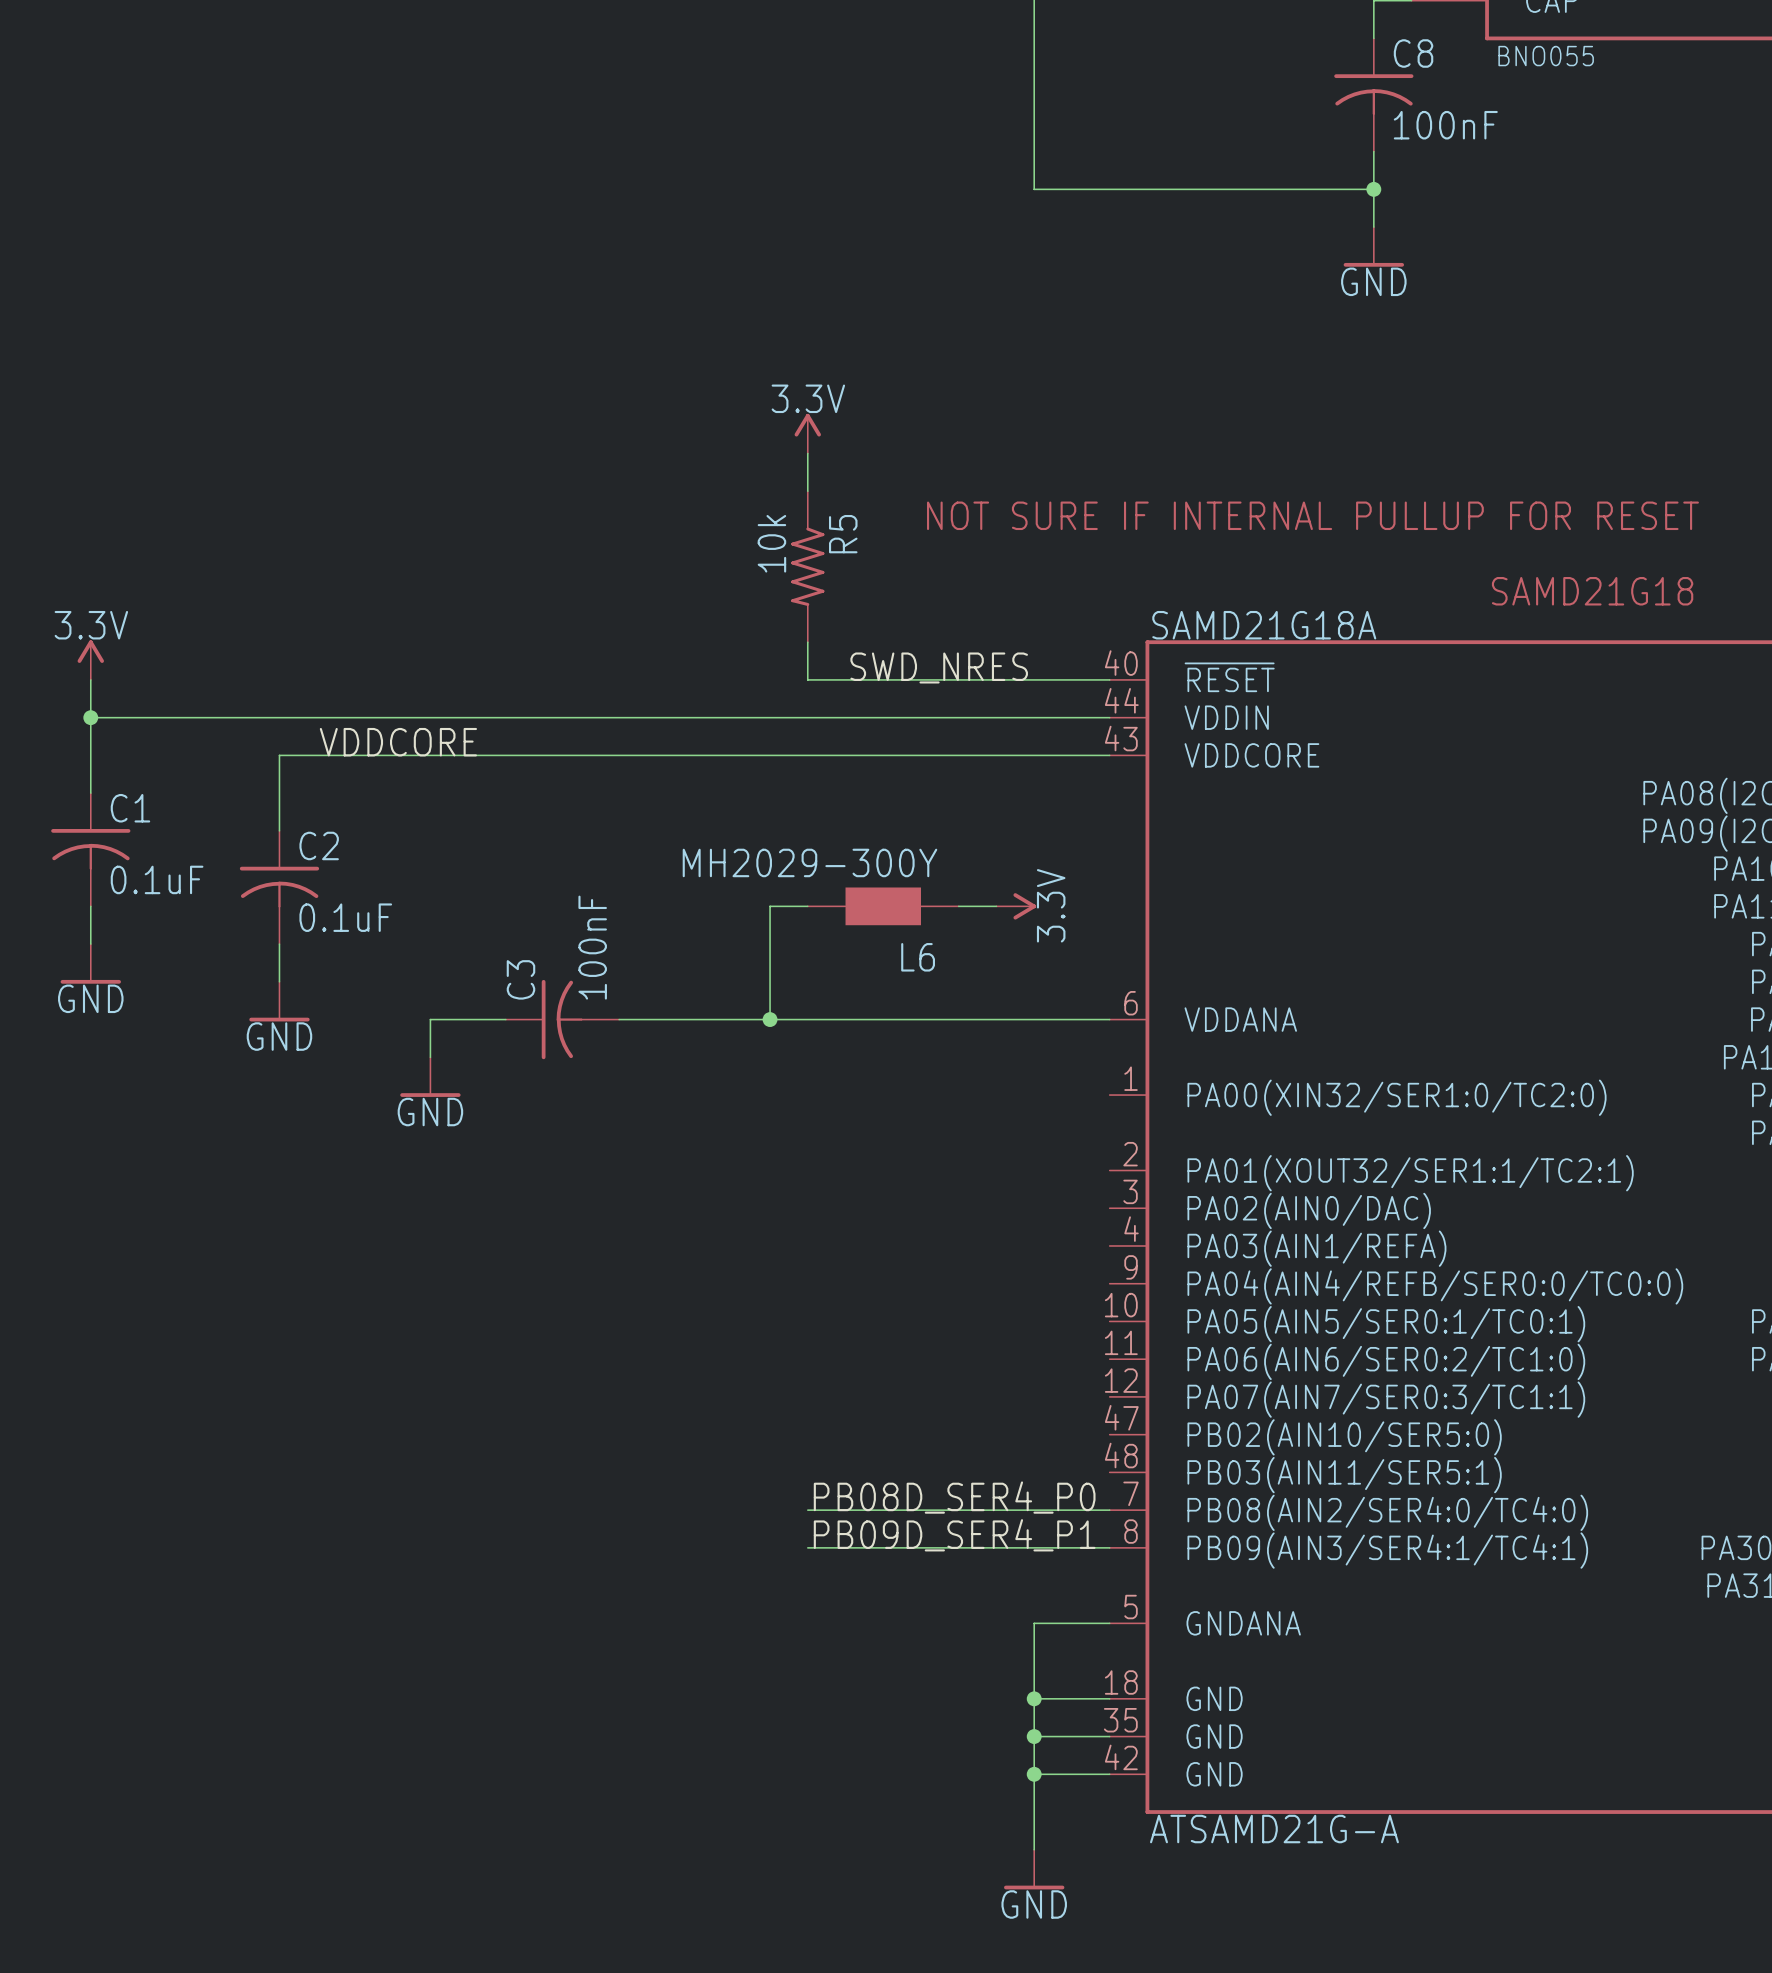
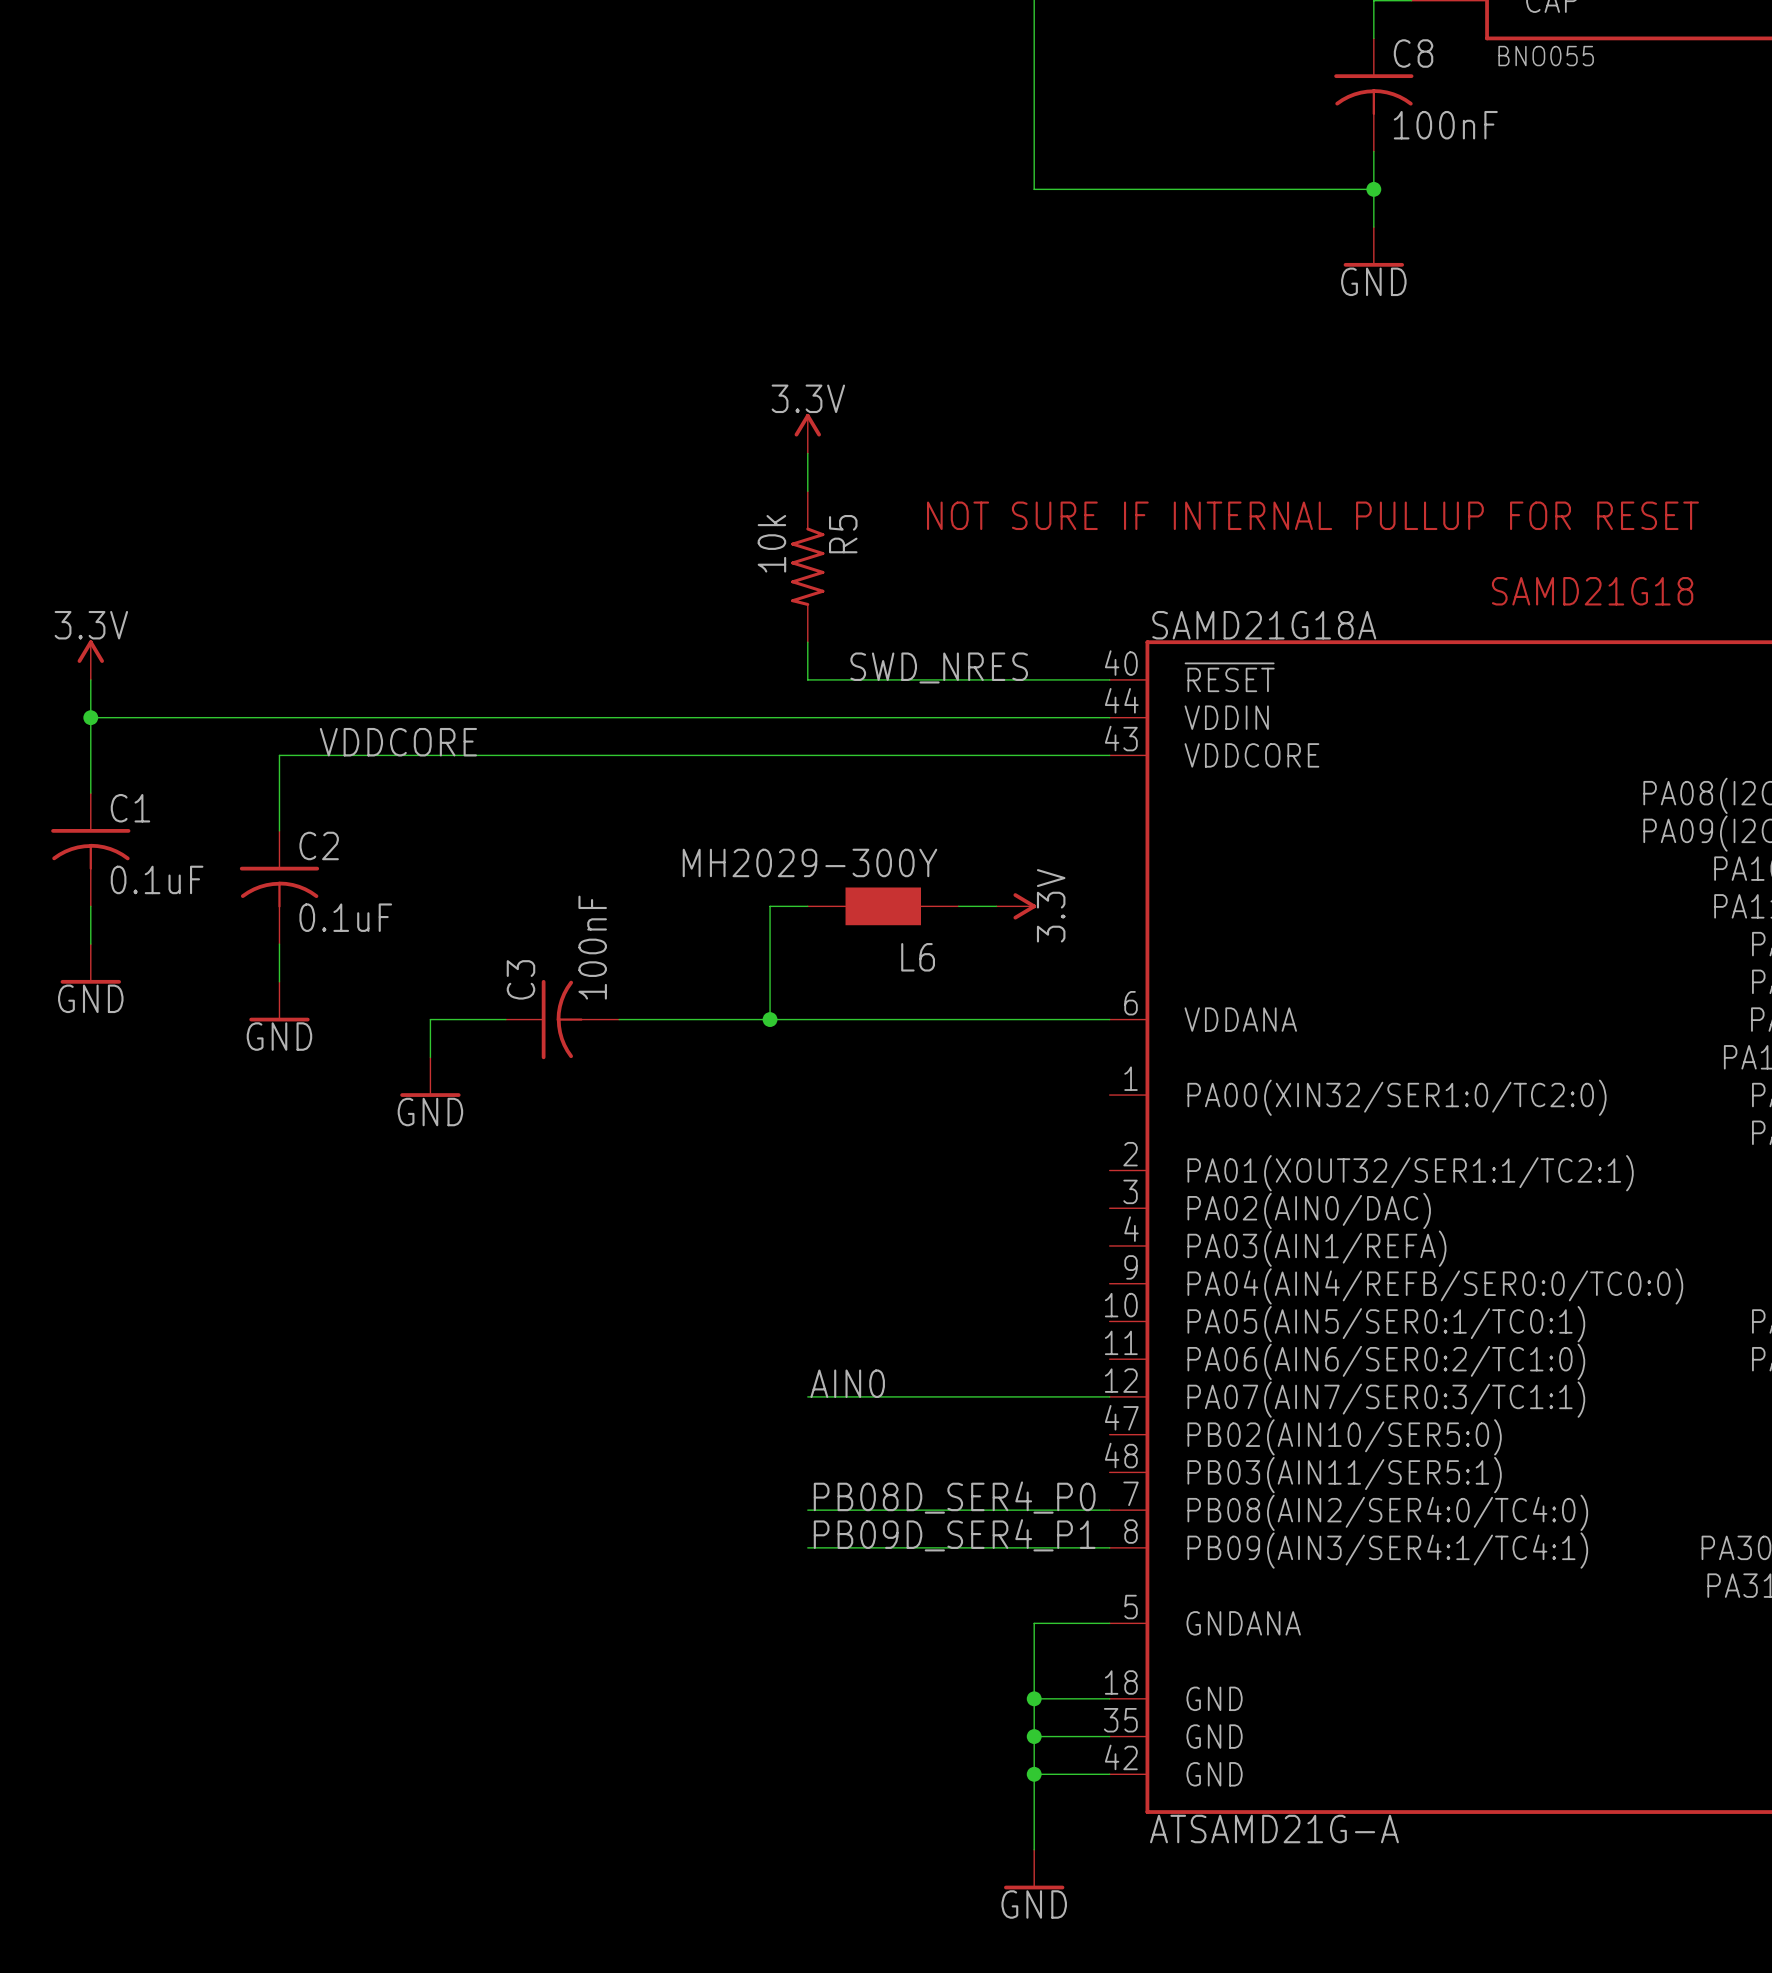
label: none -> AIN0 (847, 1383)
wire: none -> (807, 1396) (1109, 1396)

